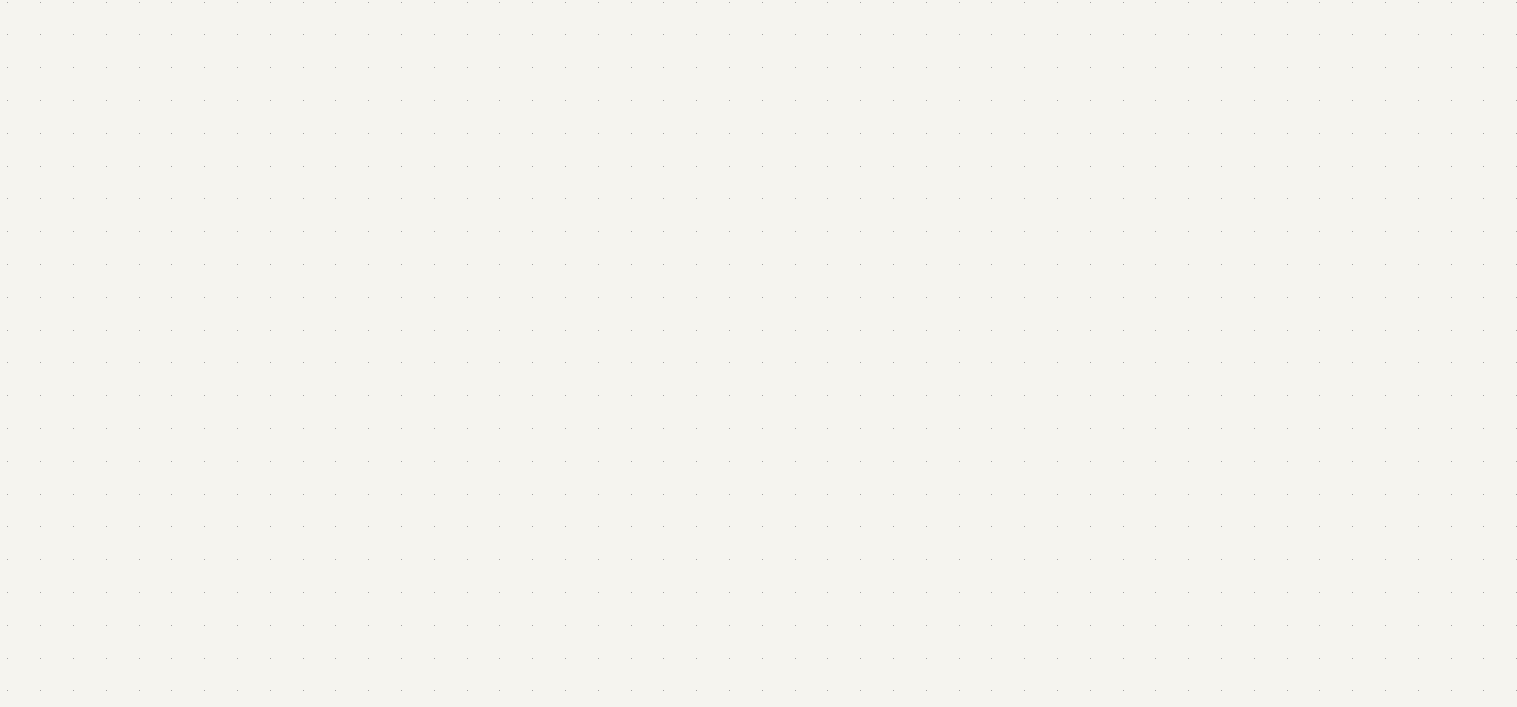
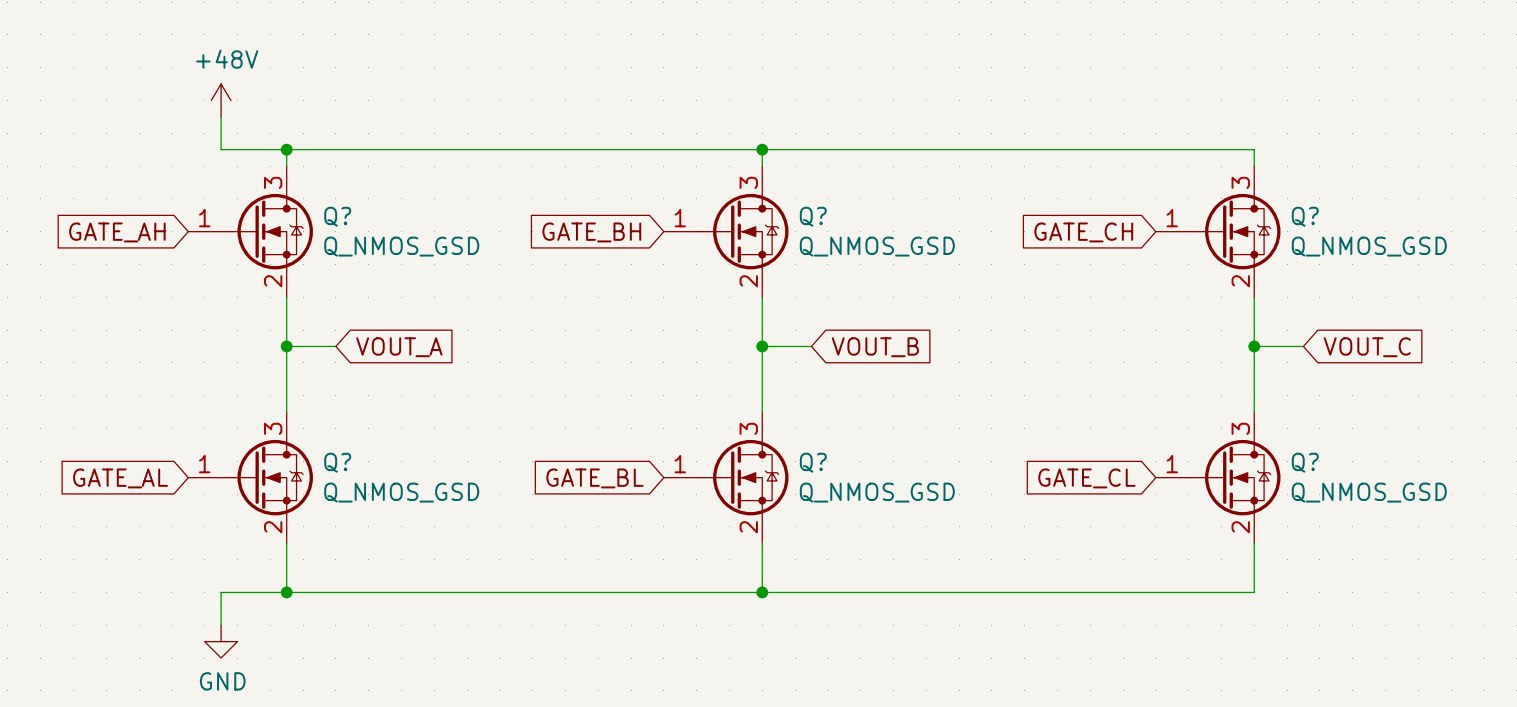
power symbol: none -> +48V (221, 100)
wire: none -> (221, 116) (221, 149) (1254, 149) (1254, 166)
wire: none -> (286, 149) (286, 166)
junction: none -> (286, 149)
wire: none -> (762, 149) (762, 166)
junction: none -> (762, 149)
Q?: none -> Q_NMOS_GSD (250, 231)
Q?: none -> Q_NMOS_GSD (726, 231)
Q?: none -> Q_NMOS_GSD (1218, 231)
global label: none -> GATE_AH (117, 232)
global label: none -> GATE_BH (591, 232)
global label: none -> GATE_CH (1083, 232)
wire: none -> (286, 297) (286, 412)
wire: none -> (762, 297) (762, 412)
wire: none -> (1254, 297) (1254, 412)
wire: none -> (286, 346) (335, 346)
junction: none -> (286, 346)
wire: none -> (762, 346) (811, 346)
junction: none -> (762, 346)
wire: none -> (1254, 346) (1303, 346)
junction: none -> (1254, 346)
global label: none -> VOUT_A (399, 347)
global label: none -> VOUT_B (875, 347)
global label: none -> VOUT_C (1367, 347)
Q?: none -> Q_NMOS_GSD (250, 477)
Q?: none -> Q_NMOS_GSD (726, 477)
Q?: none -> Q_NMOS_GSD (1218, 477)
global label: none -> GATE_AL (120, 478)
global label: none -> GATE_BL (594, 478)
global label: none -> GATE_CL (1086, 478)
wire: none -> (286, 543) (286, 592)
wire: none -> (762, 543) (762, 592)
wire: none -> (1254, 543) (1254, 592) (221, 592) (221, 625)
junction: none -> (286, 592)
junction: none -> (762, 592)
power symbol: none -> GND (221, 641)

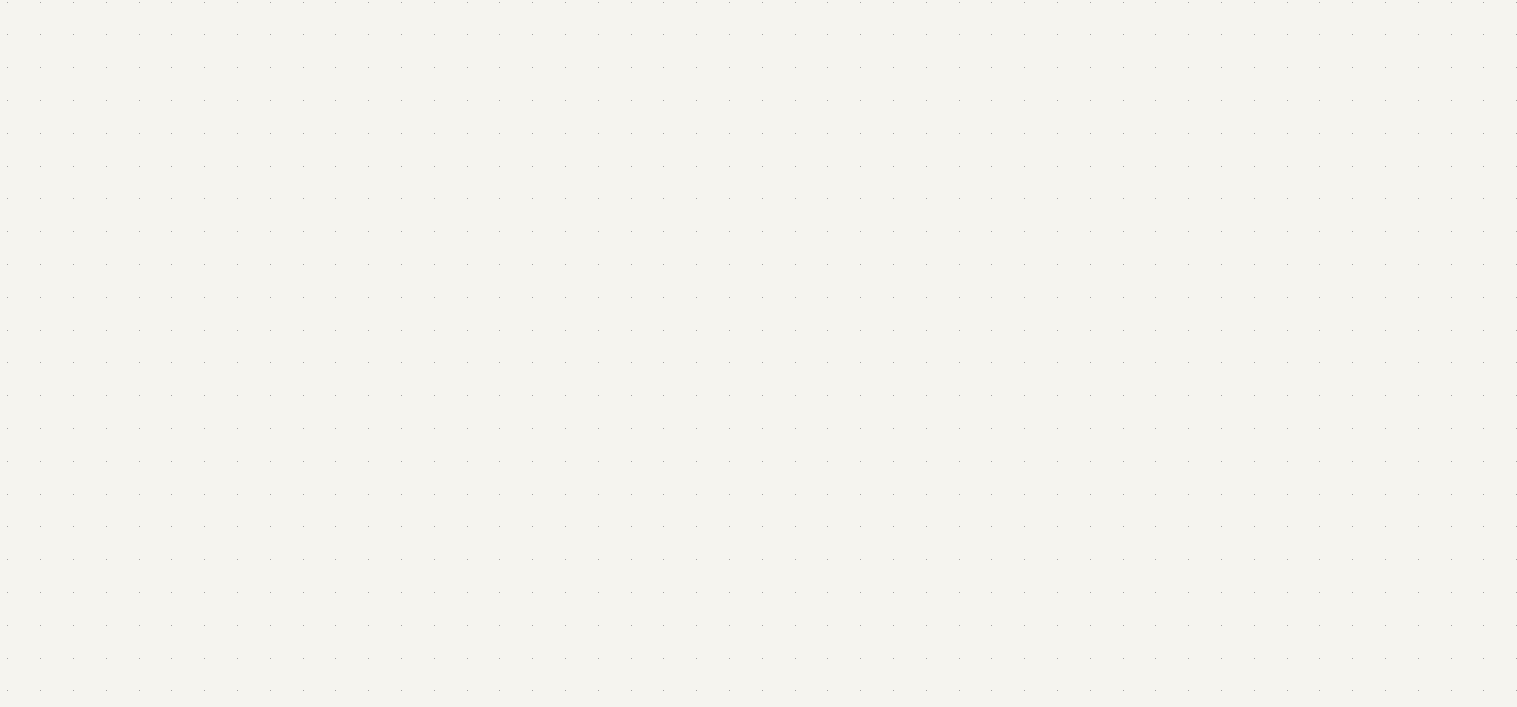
power symbol: +48V (221, 100) -> none
wire: (221, 116) (221, 149) (1254, 149) (1254, 166) -> none
wire: (286, 149) (286, 166) -> none
junction: (286, 149) -> none
wire: (762, 149) (762, 166) -> none
junction: (762, 149) -> none
Q?: Q_NMOS_GSD (250, 231) -> none
Q?: Q_NMOS_GSD (726, 231) -> none
Q?: Q_NMOS_GSD (1218, 231) -> none
global label: GATE_AH (117, 232) -> none
global label: GATE_BH (591, 232) -> none
global label: GATE_CH (1083, 232) -> none
wire: (286, 297) (286, 412) -> none
wire: (762, 297) (762, 412) -> none
wire: (1254, 297) (1254, 412) -> none
wire: (286, 346) (335, 346) -> none
junction: (286, 346) -> none
wire: (762, 346) (811, 346) -> none
junction: (762, 346) -> none
wire: (1254, 346) (1303, 346) -> none
junction: (1254, 346) -> none
global label: VOUT_A (399, 347) -> none
global label: VOUT_B (875, 347) -> none
global label: VOUT_C (1367, 347) -> none
Q?: Q_NMOS_GSD (250, 477) -> none
Q?: Q_NMOS_GSD (726, 477) -> none
Q?: Q_NMOS_GSD (1218, 477) -> none
global label: GATE_AL (120, 478) -> none
global label: GATE_BL (594, 478) -> none
global label: GATE_CL (1086, 478) -> none
wire: (286, 543) (286, 592) -> none
wire: (762, 543) (762, 592) -> none
wire: (1254, 543) (1254, 592) (221, 592) (221, 625) -> none
junction: (286, 592) -> none
junction: (762, 592) -> none
power symbol: GND (221, 641) -> none

